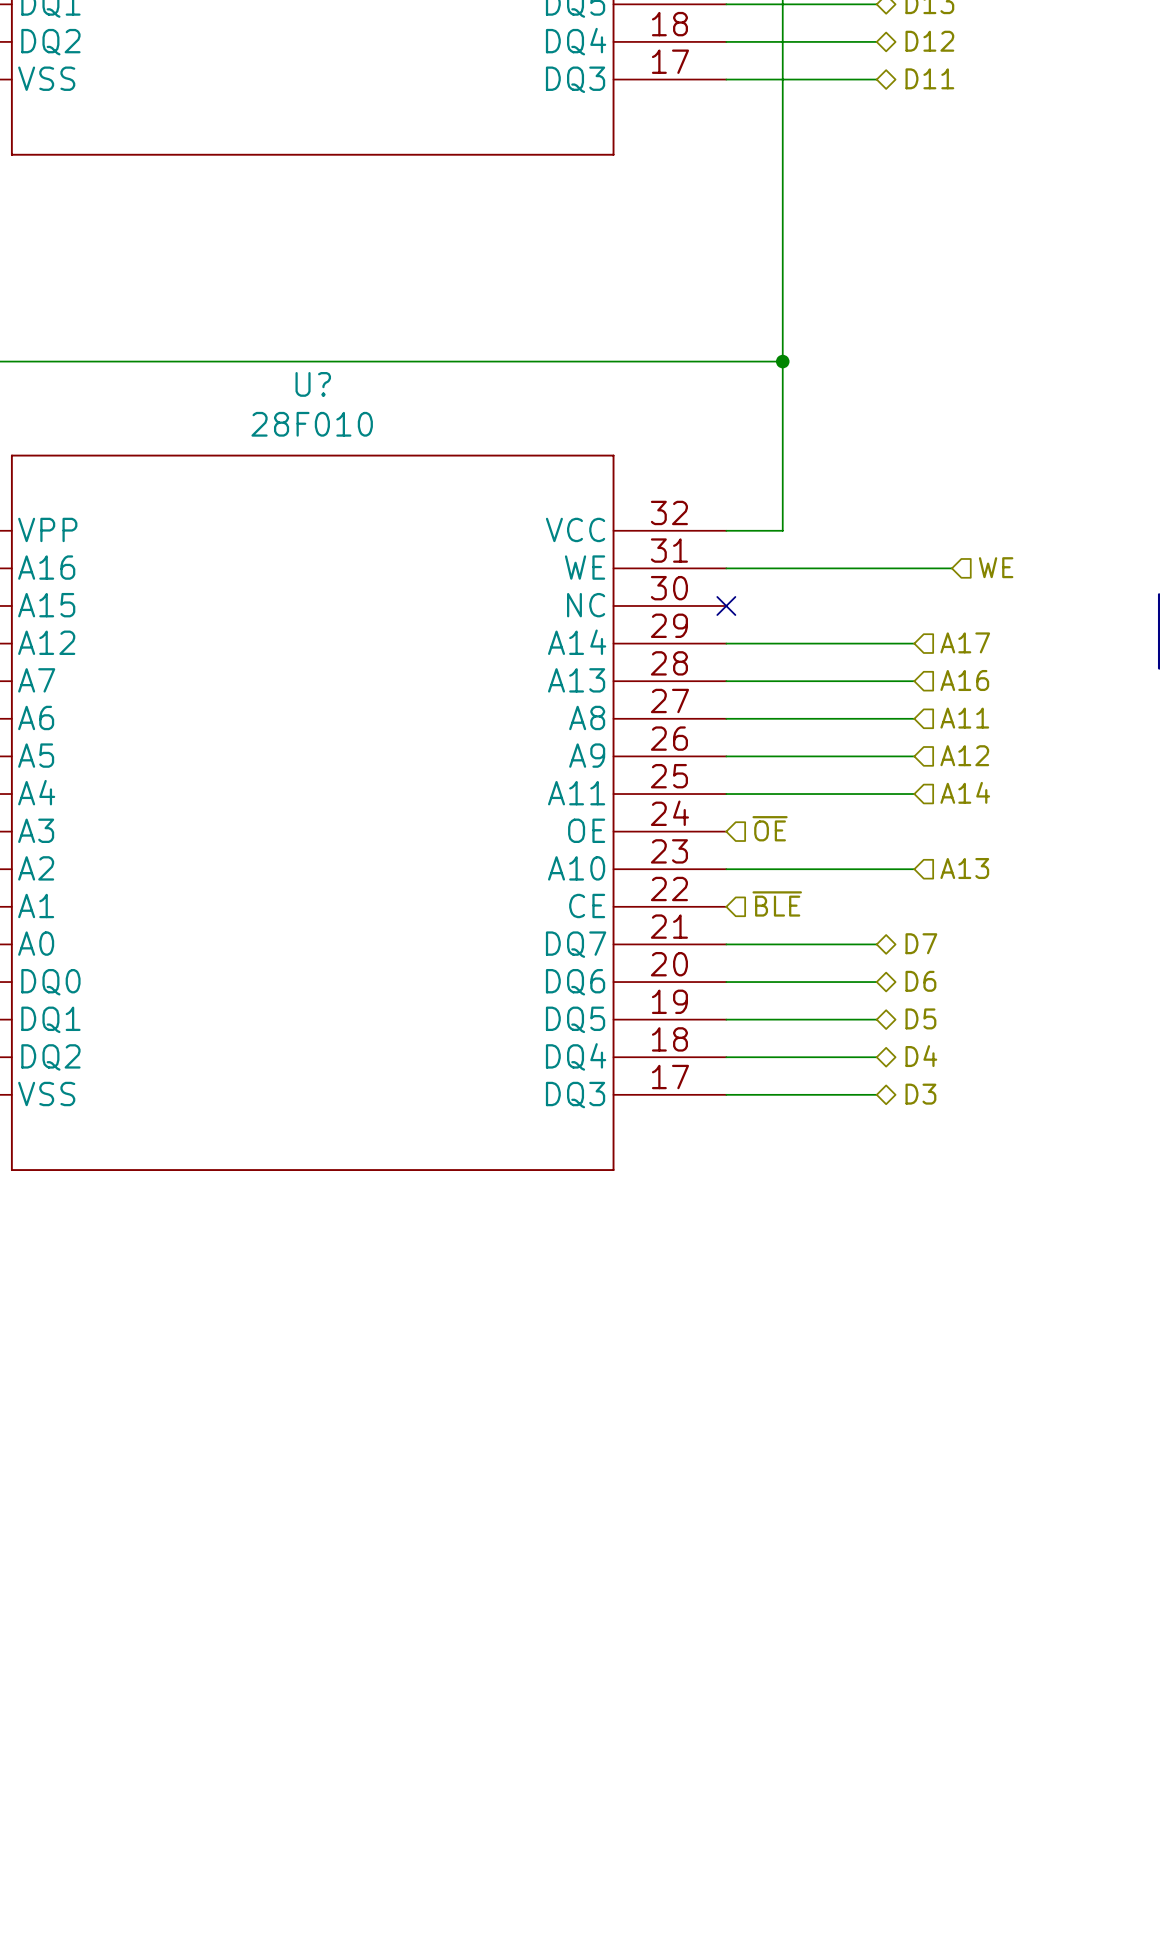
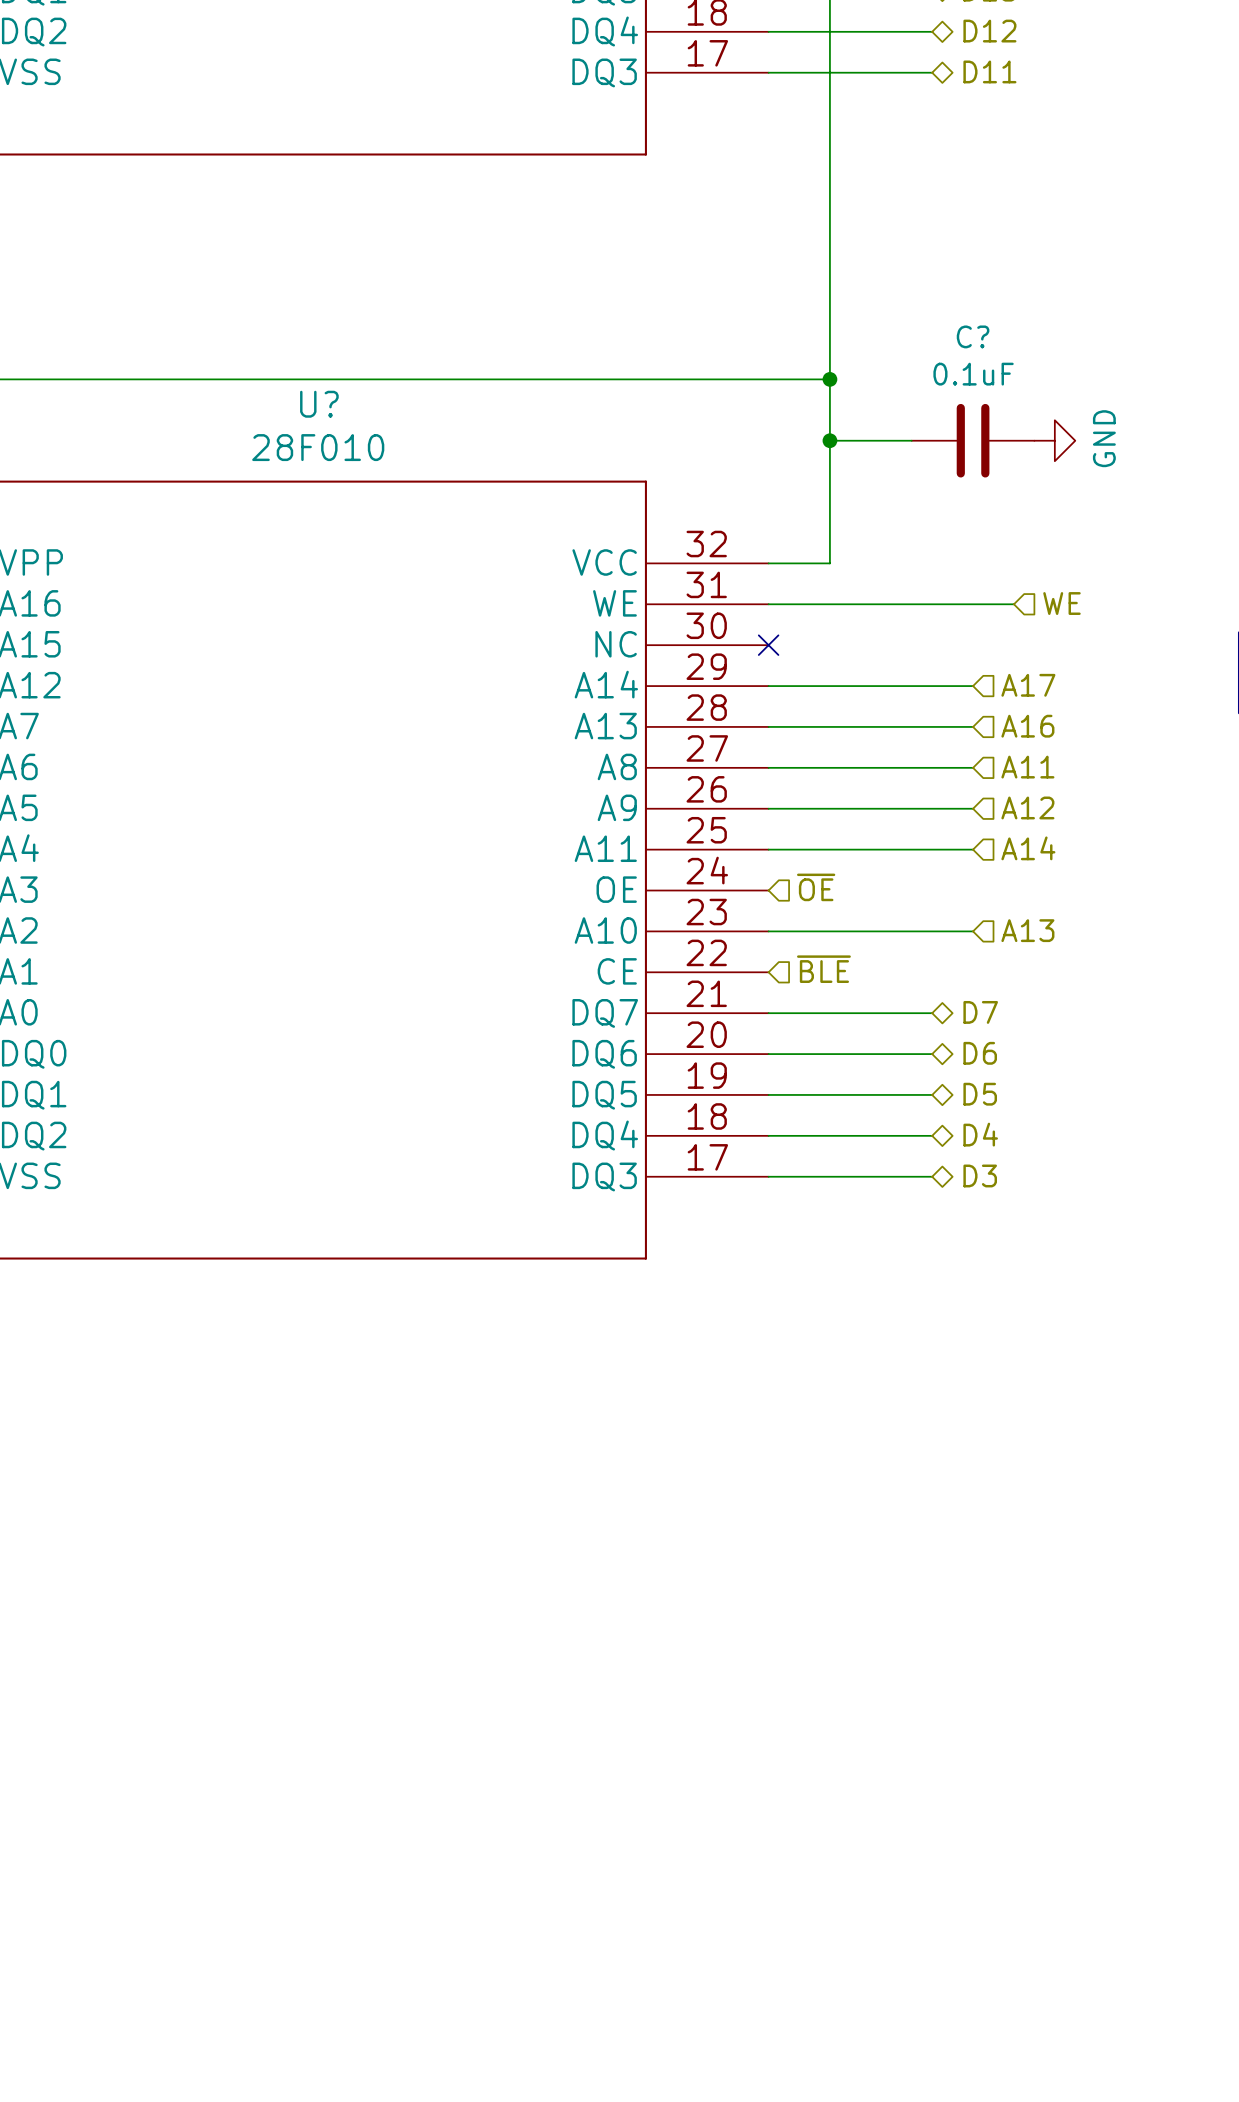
wire: none -> (829, 440) (911, 440)
junction: none -> (829, 440)
C?: none -> 0.1uF (973, 440)
power symbol: none -> GND (1054, 440)

